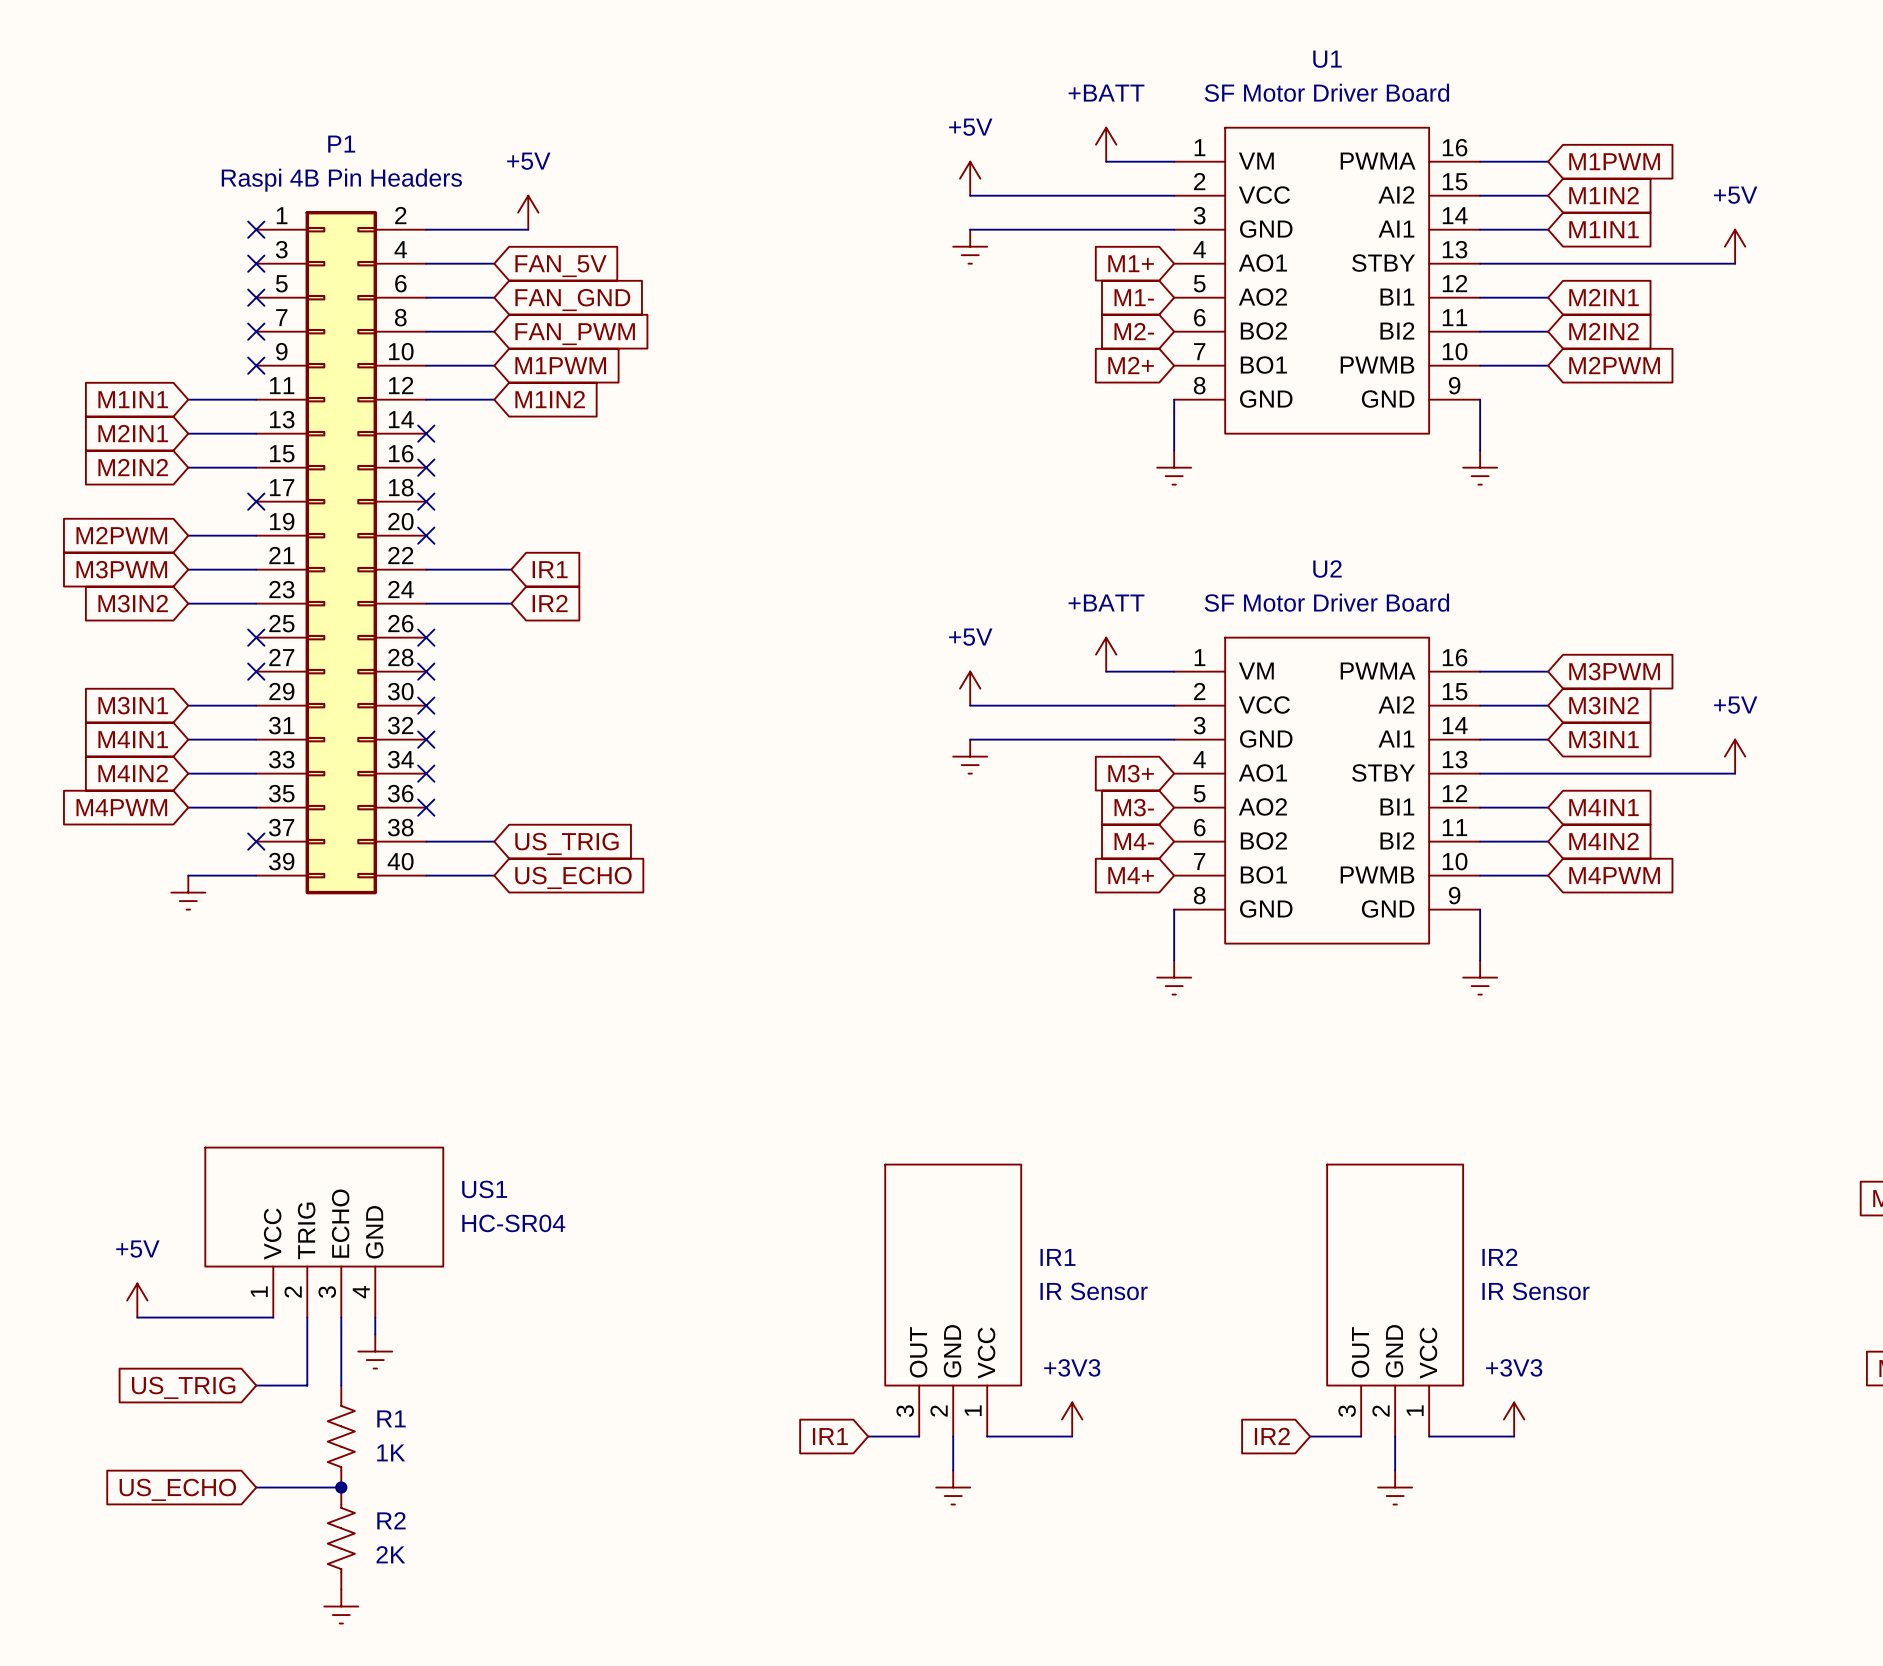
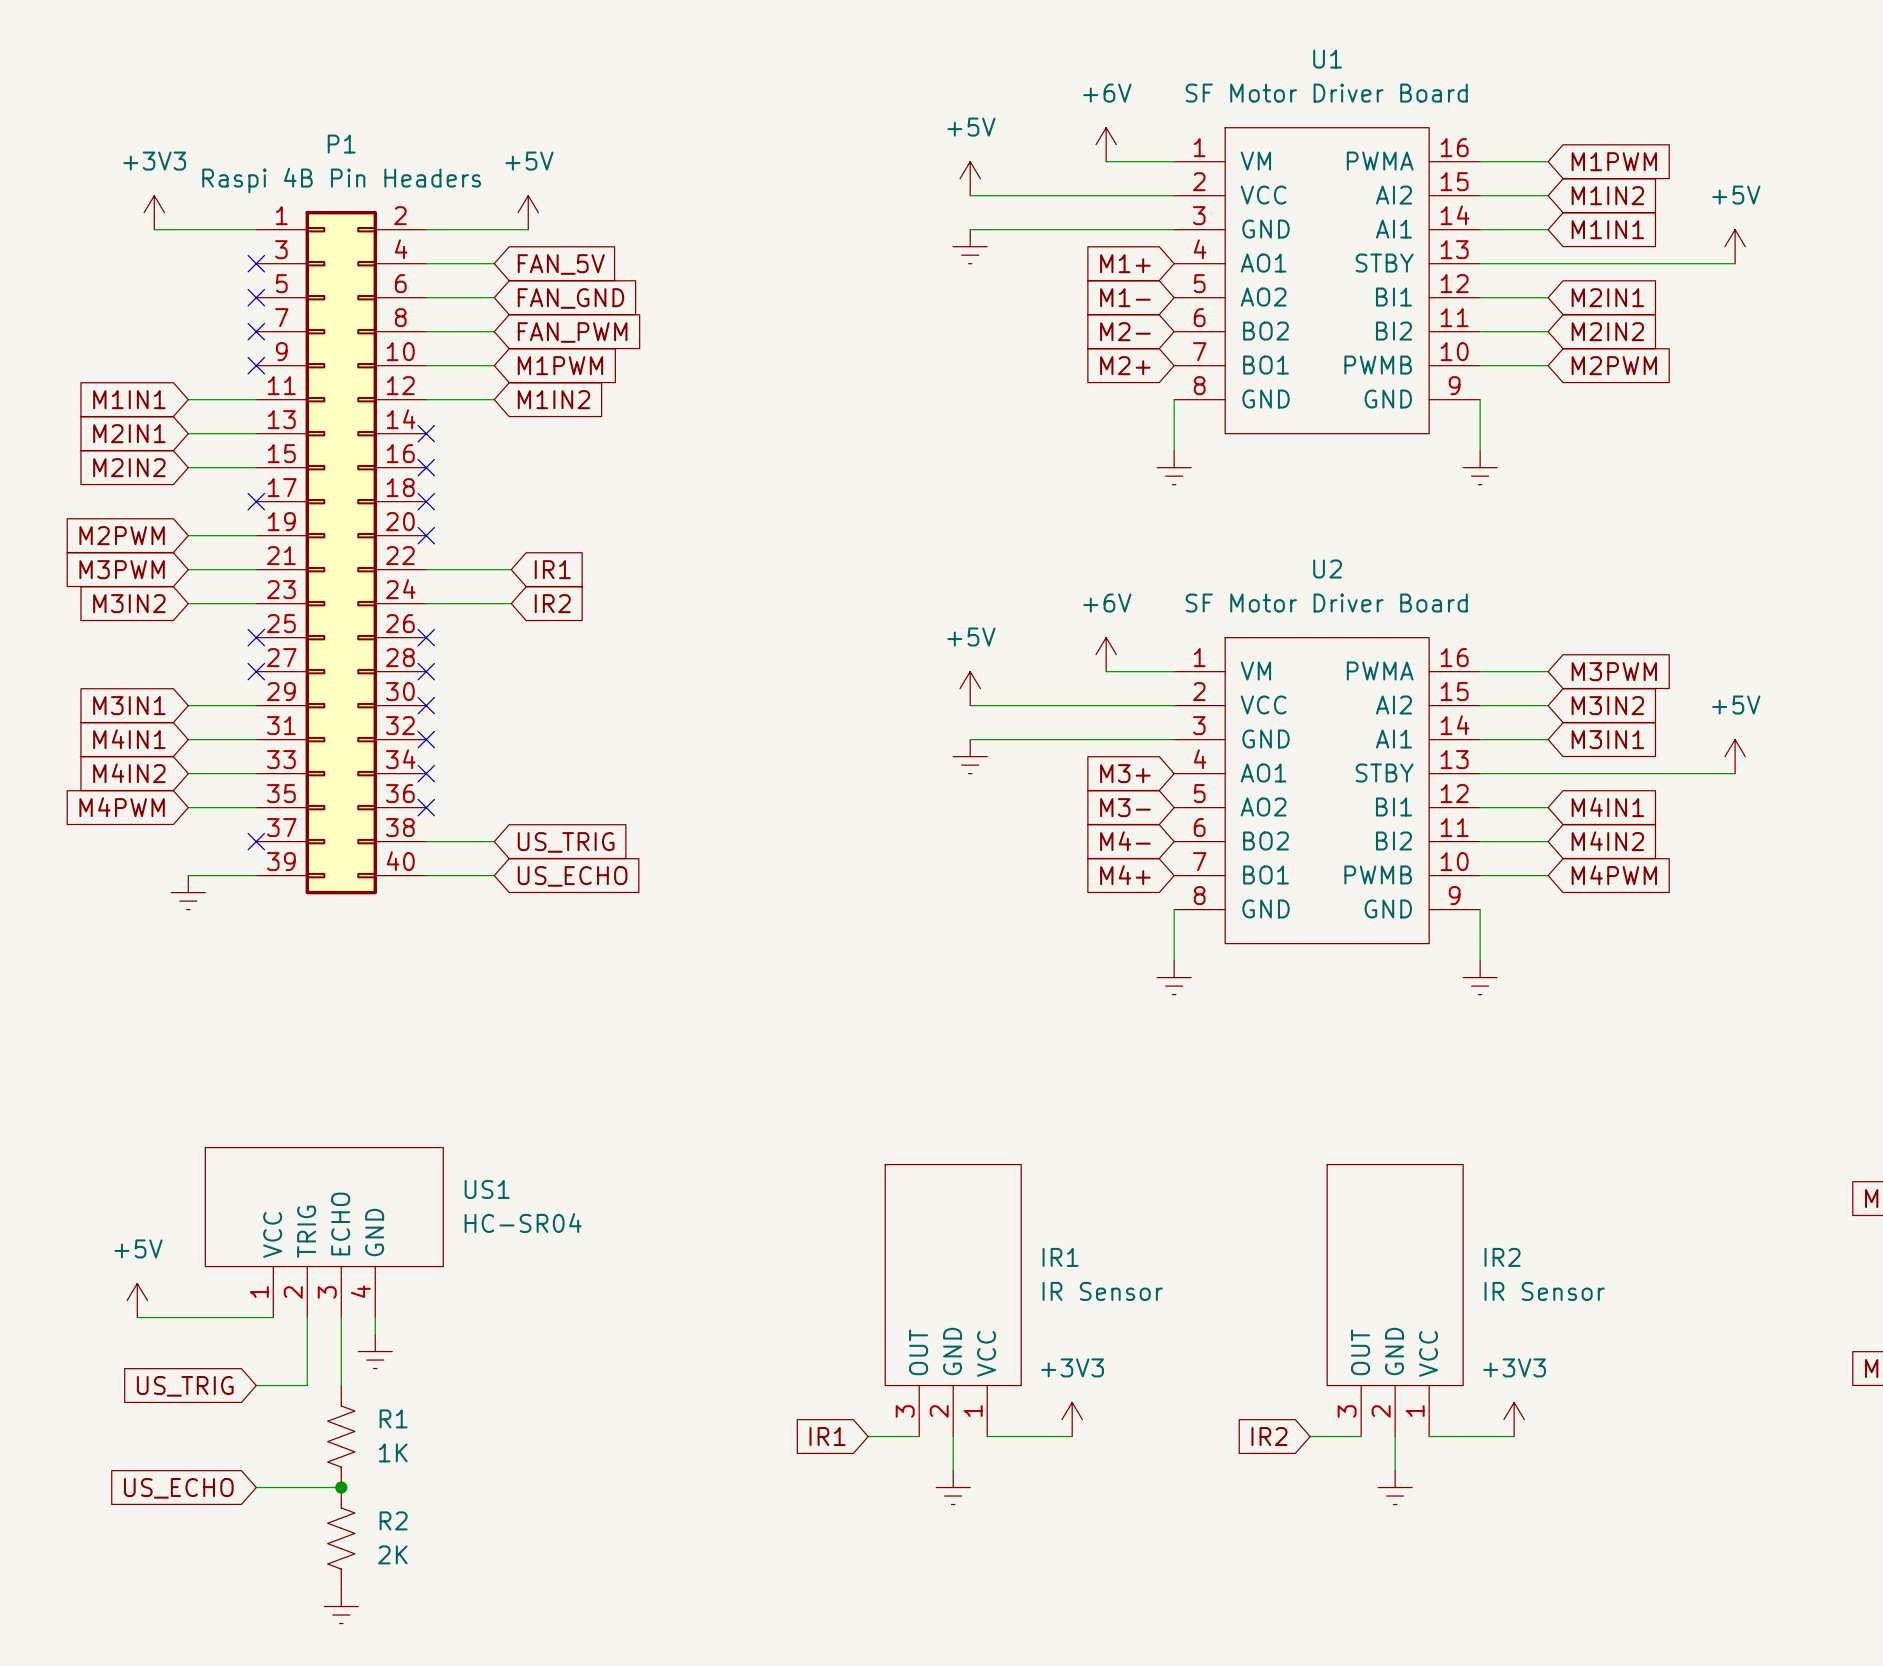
power symbol: +BATT (1106, 144) -> +6V (1106, 144)
power symbol: none -> +3V3 (154, 212)
wire: none -> (154, 229) (256, 229)
no-connect mark: (256, 229) -> none
power symbol: +BATT (1106, 654) -> +6V (1106, 654)

